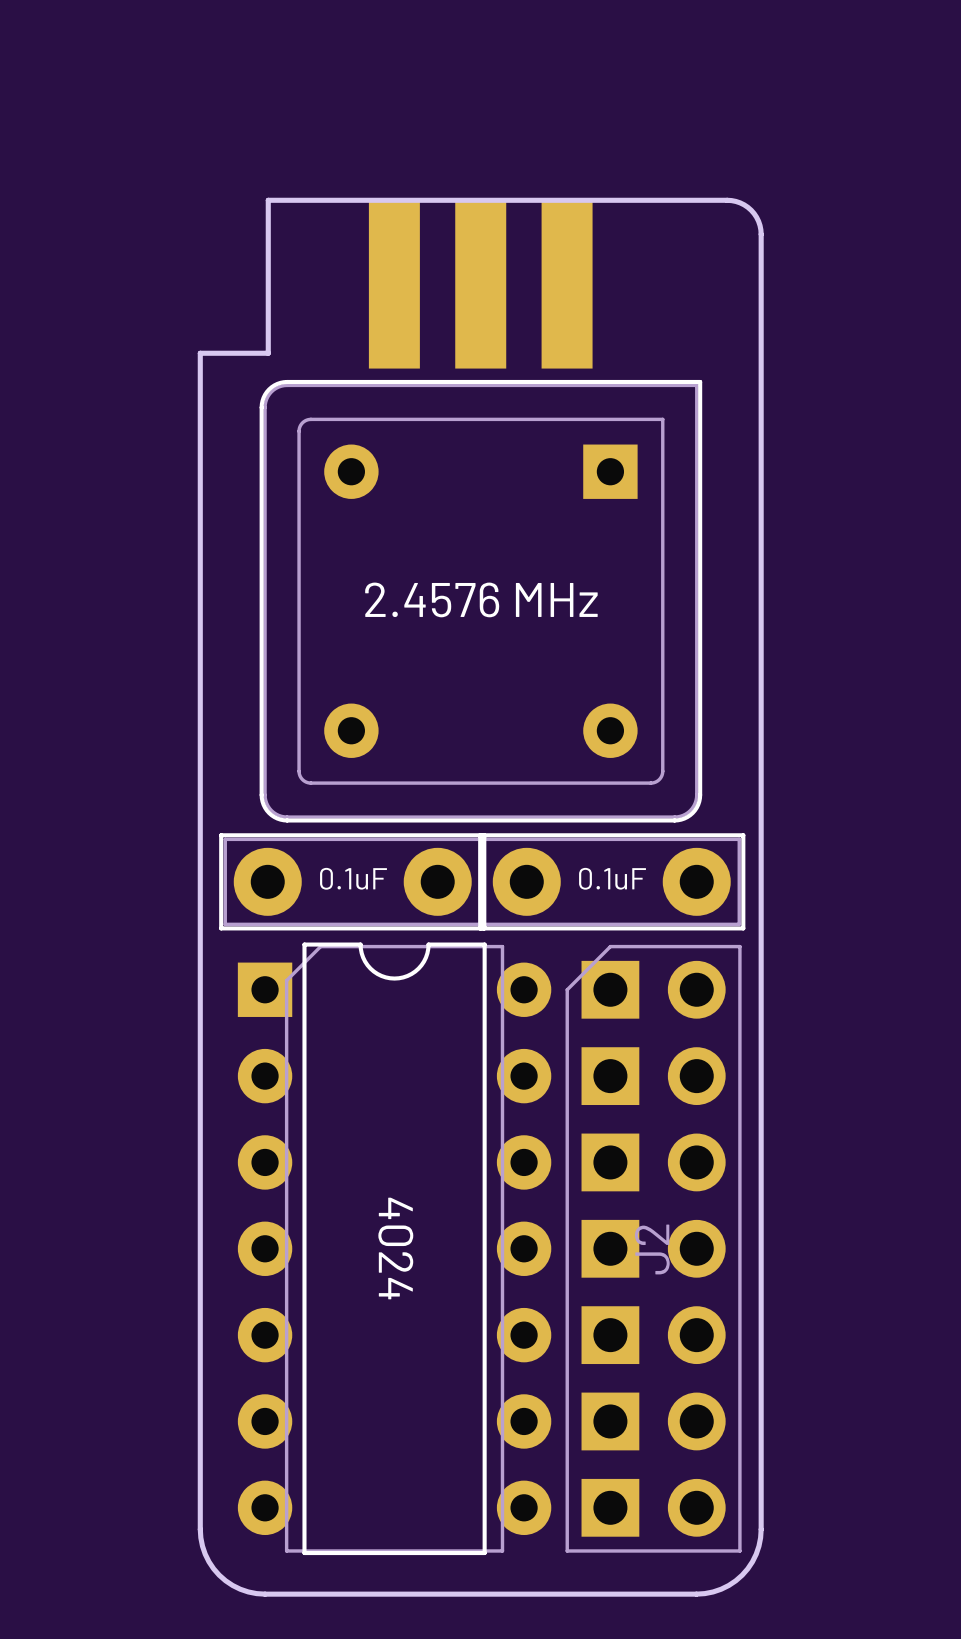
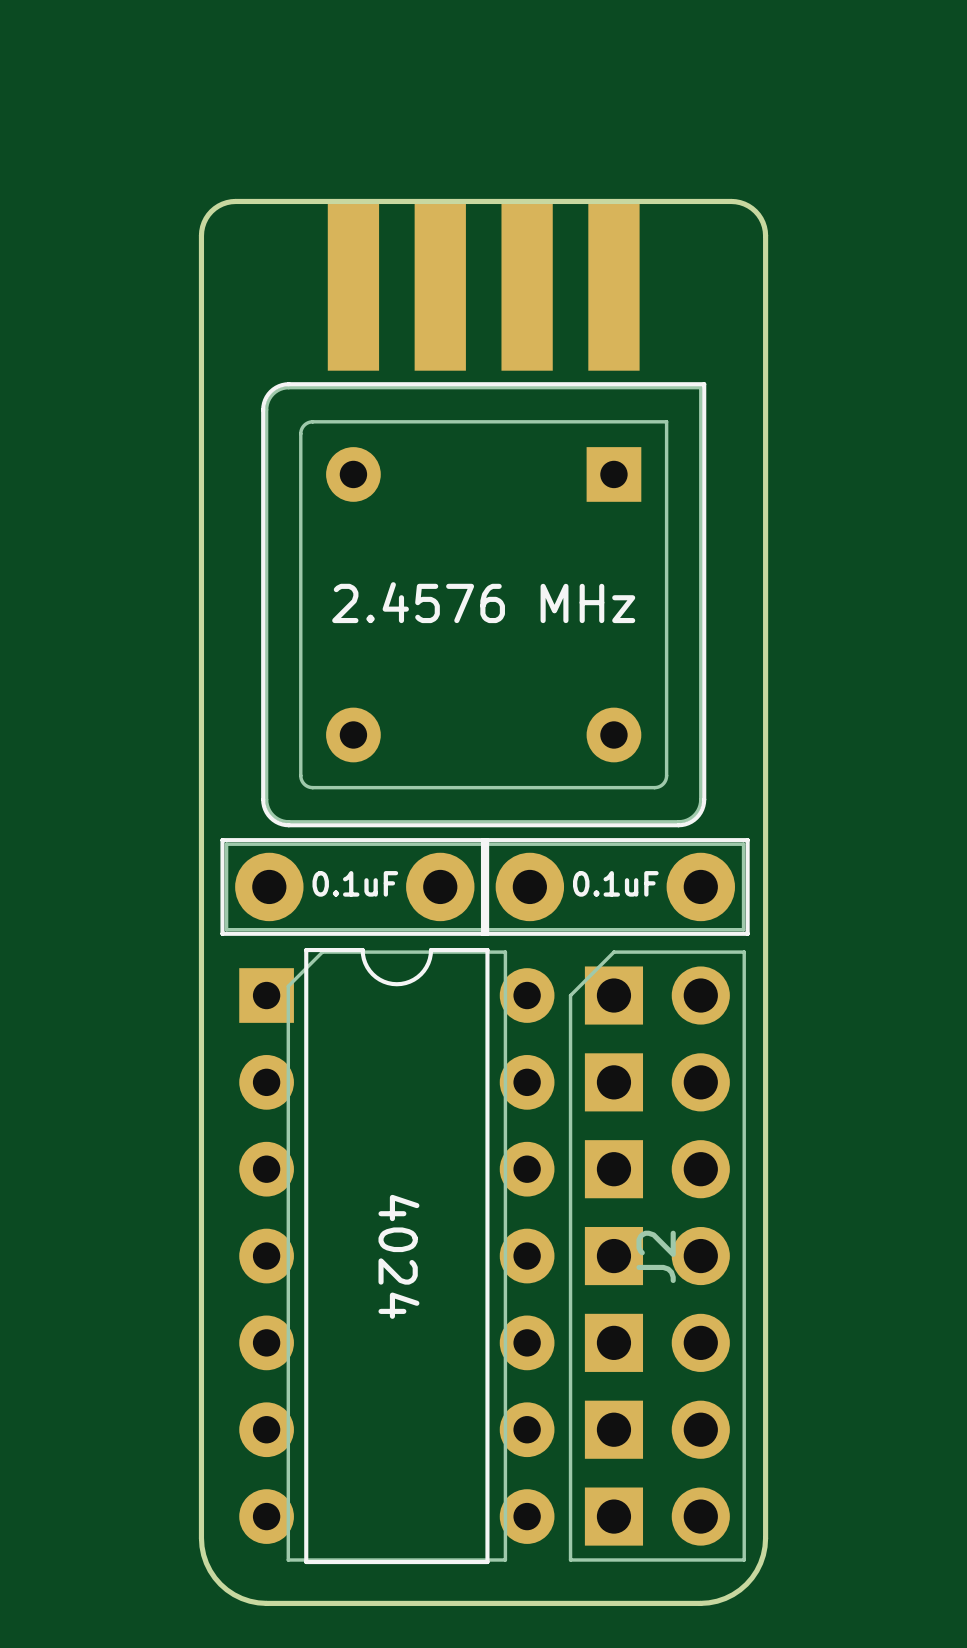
part footprint: [368, 198, 593, 369] -> [327, 199, 640, 371]
board edge: (268, 200) (268, 353) (200, 353) -> (269, 201) (226, 202) (211, 211) (204, 222) (201, 235) (201, 355)

